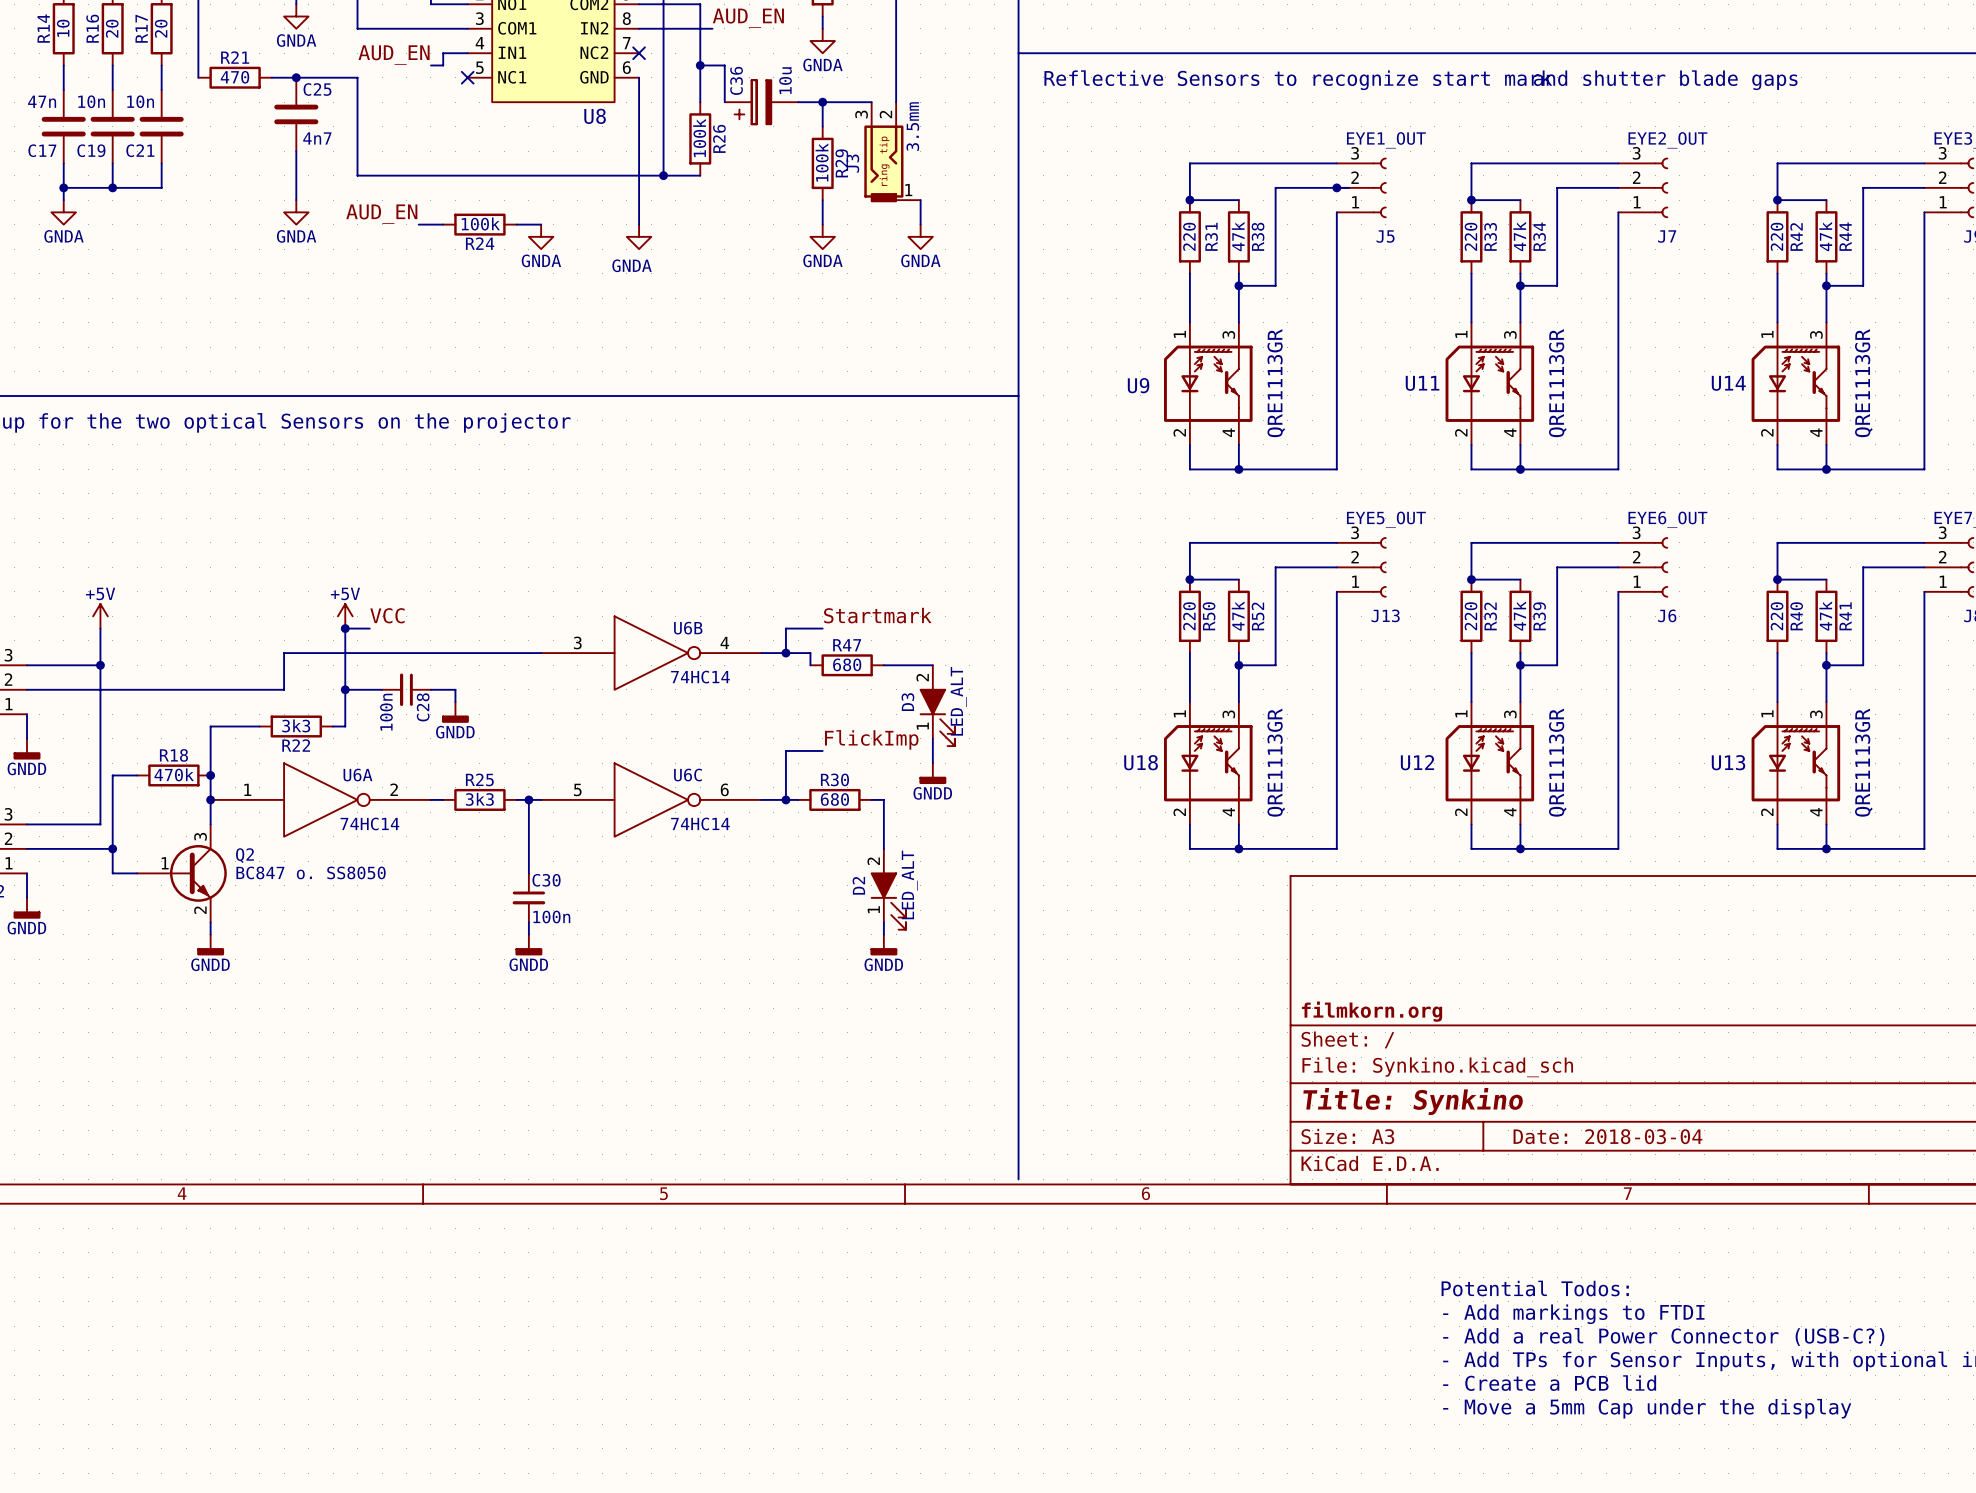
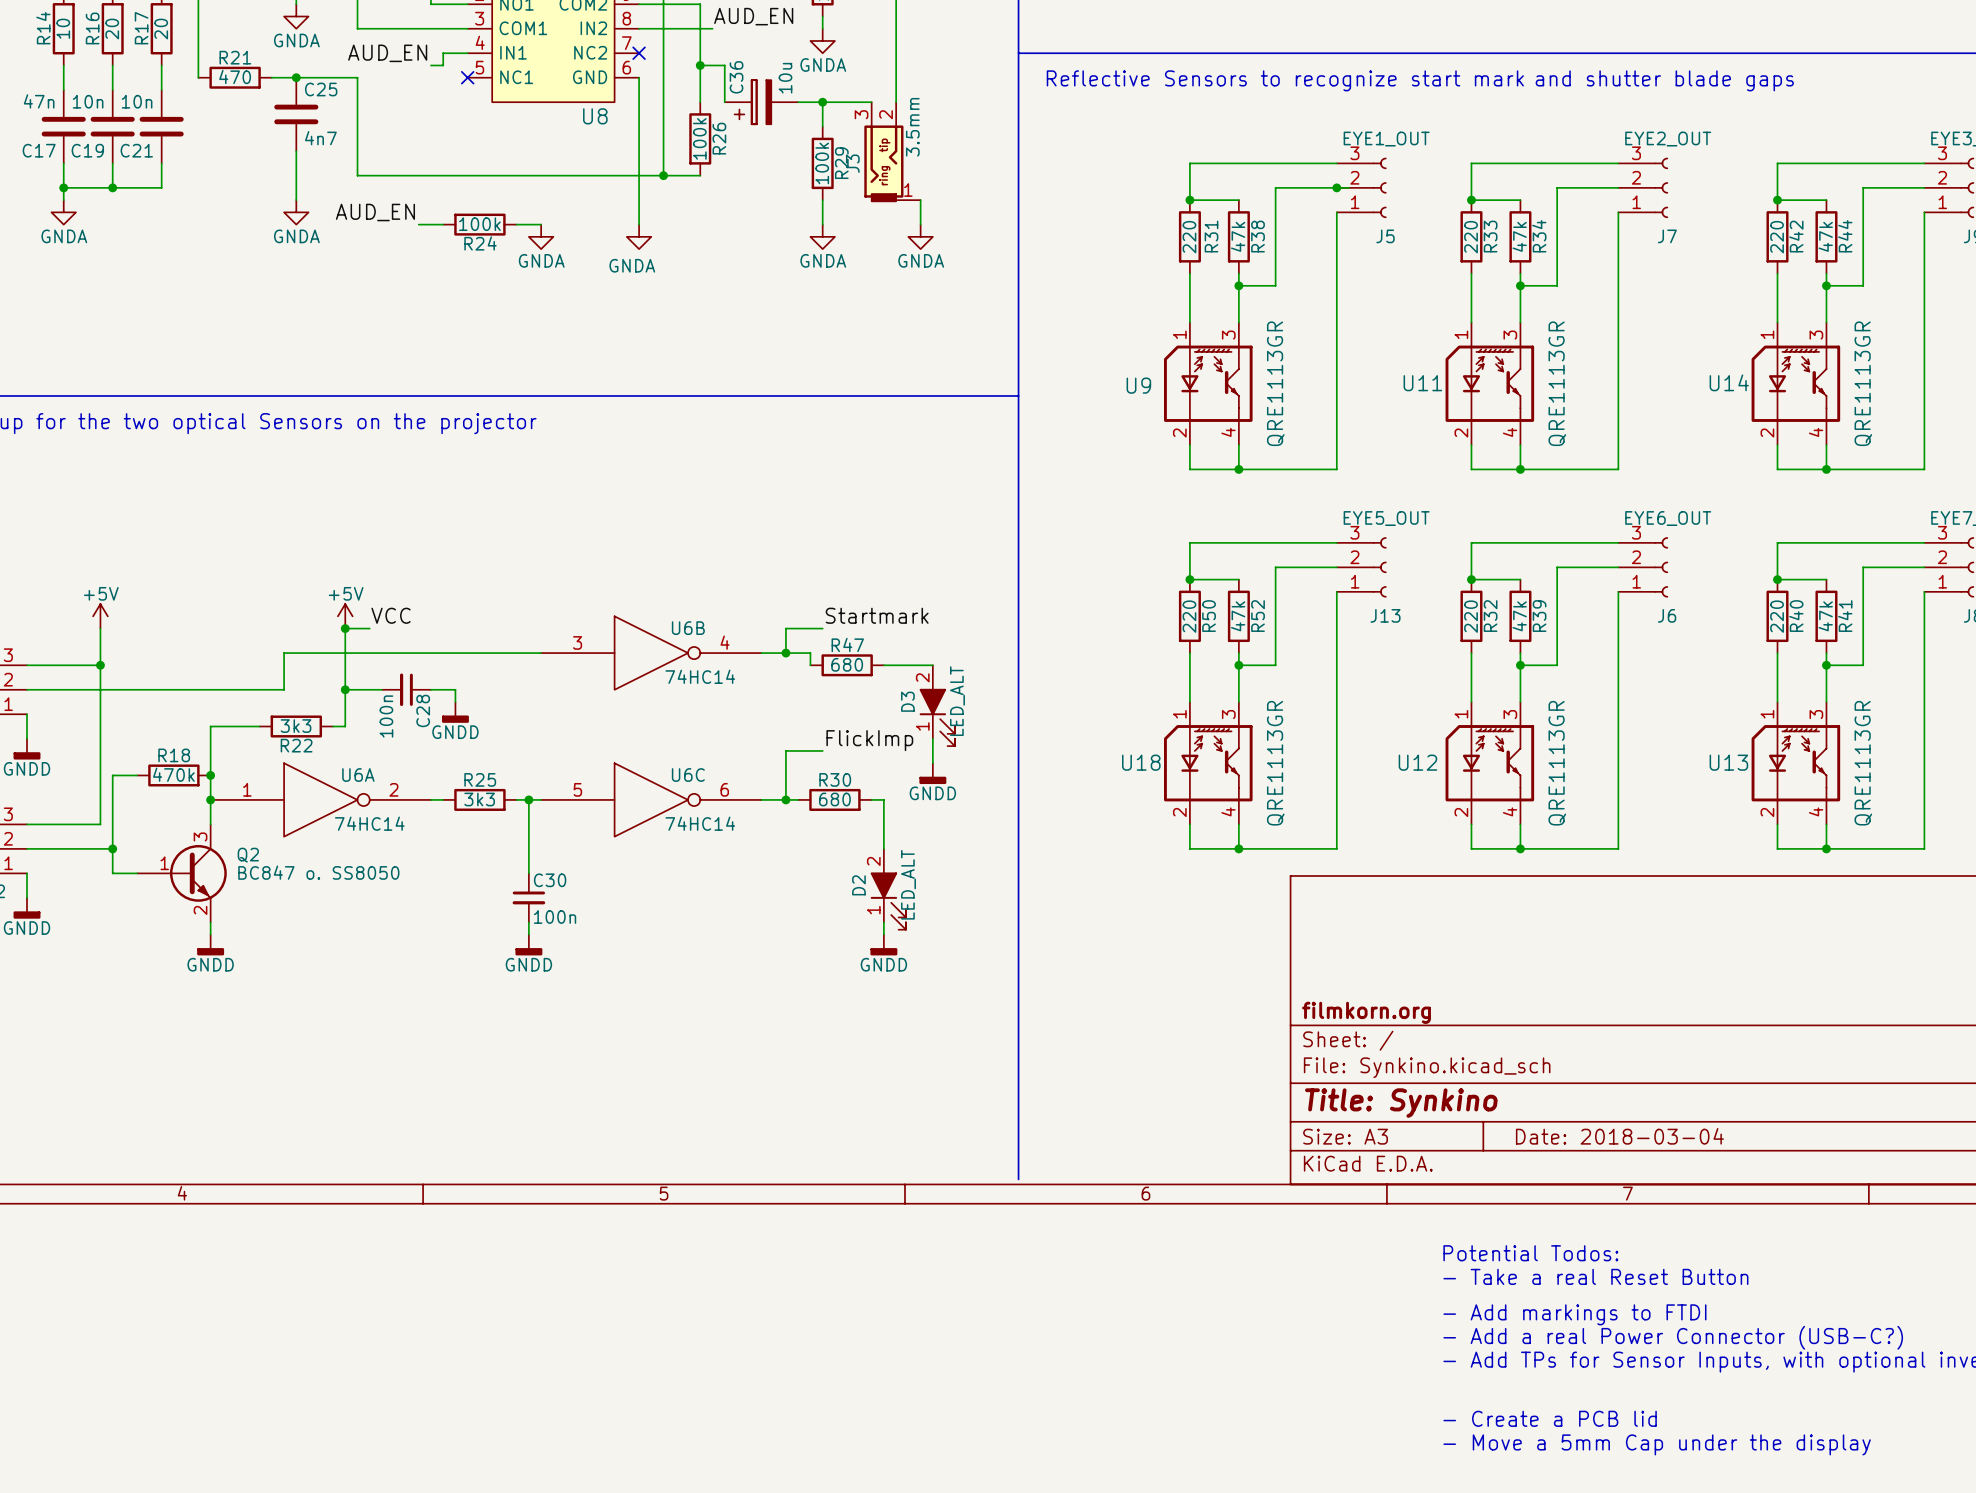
text: none -> - Take a real Reset Button (1595, 1276)
text position: Potential Todos: (1535, 1288) -> Potential Todos: (1530, 1253)
text position: - Create a PCB lid (1549, 1383) -> - Create a PCB lid (1550, 1418)
text position: - Move a 5mm Cap under the display (1647, 1408) -> - Move a 5mm Cap under the display (1657, 1444)

